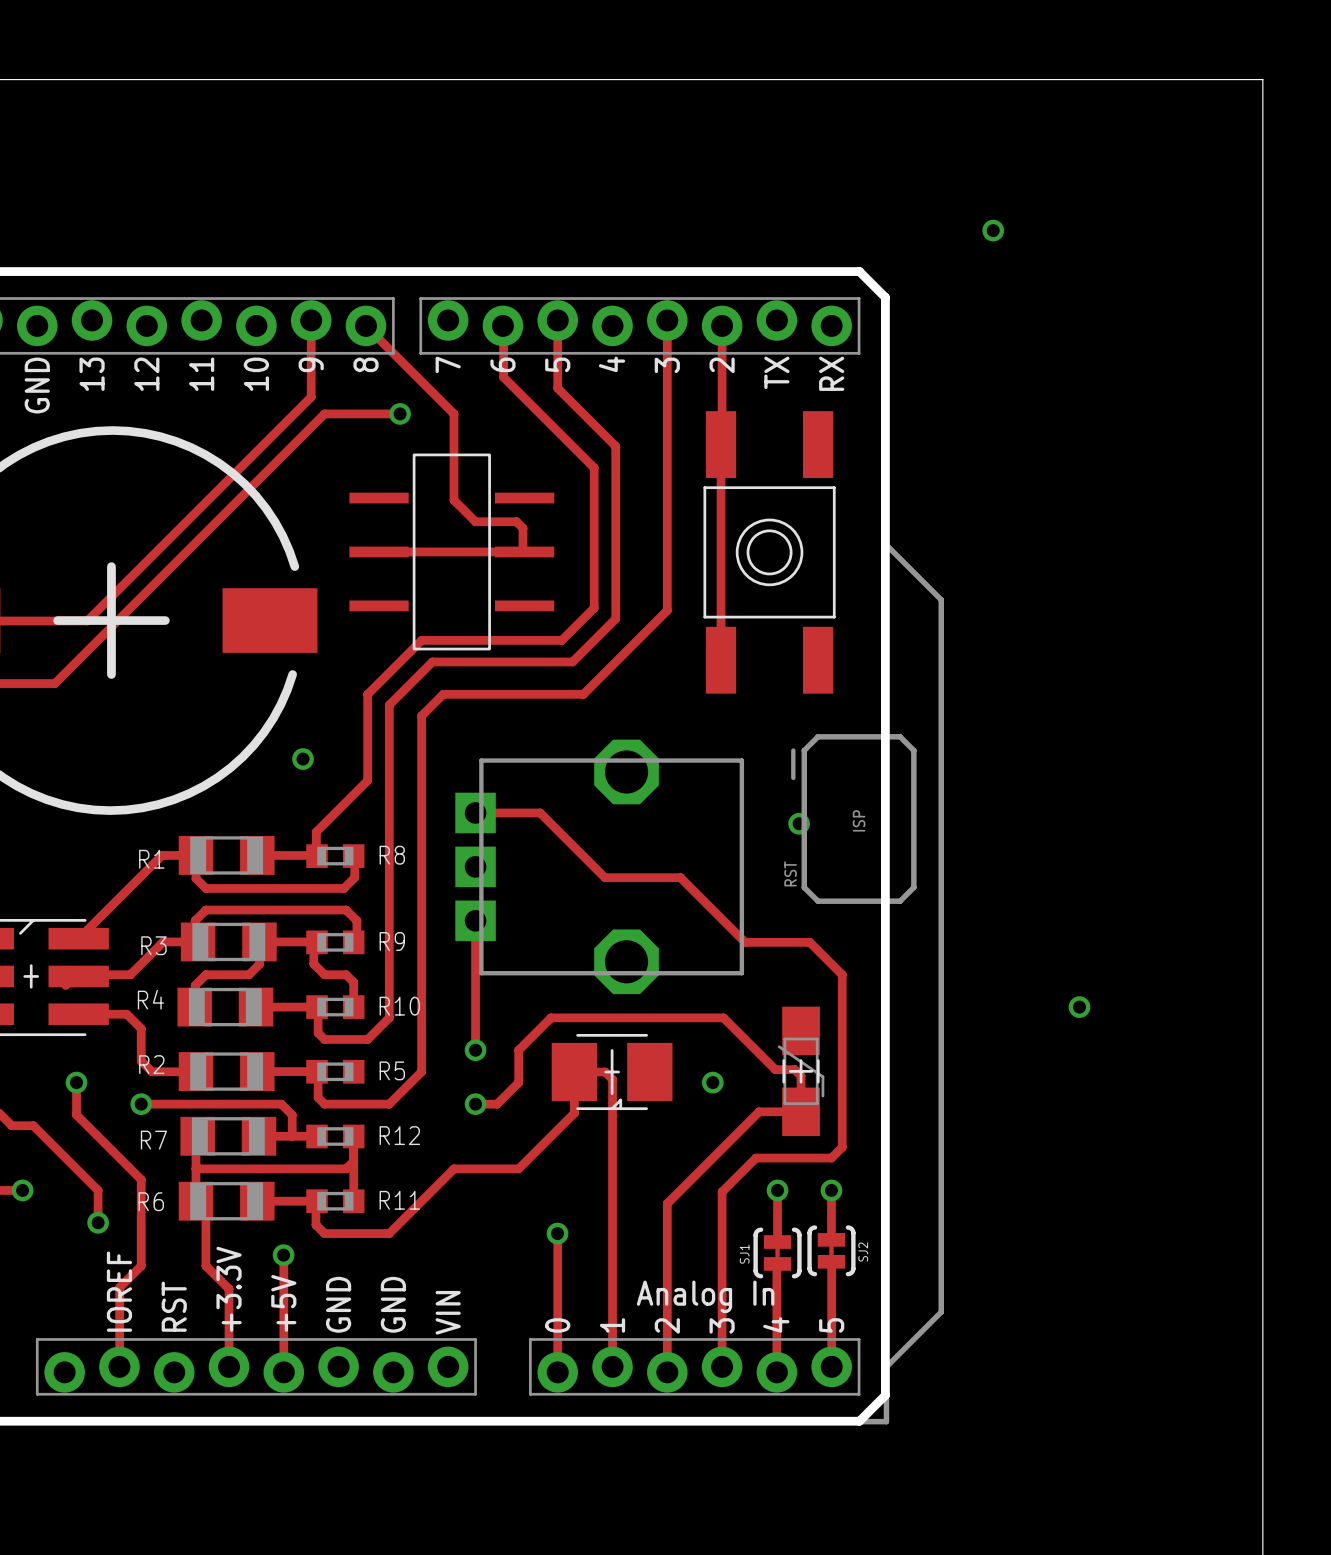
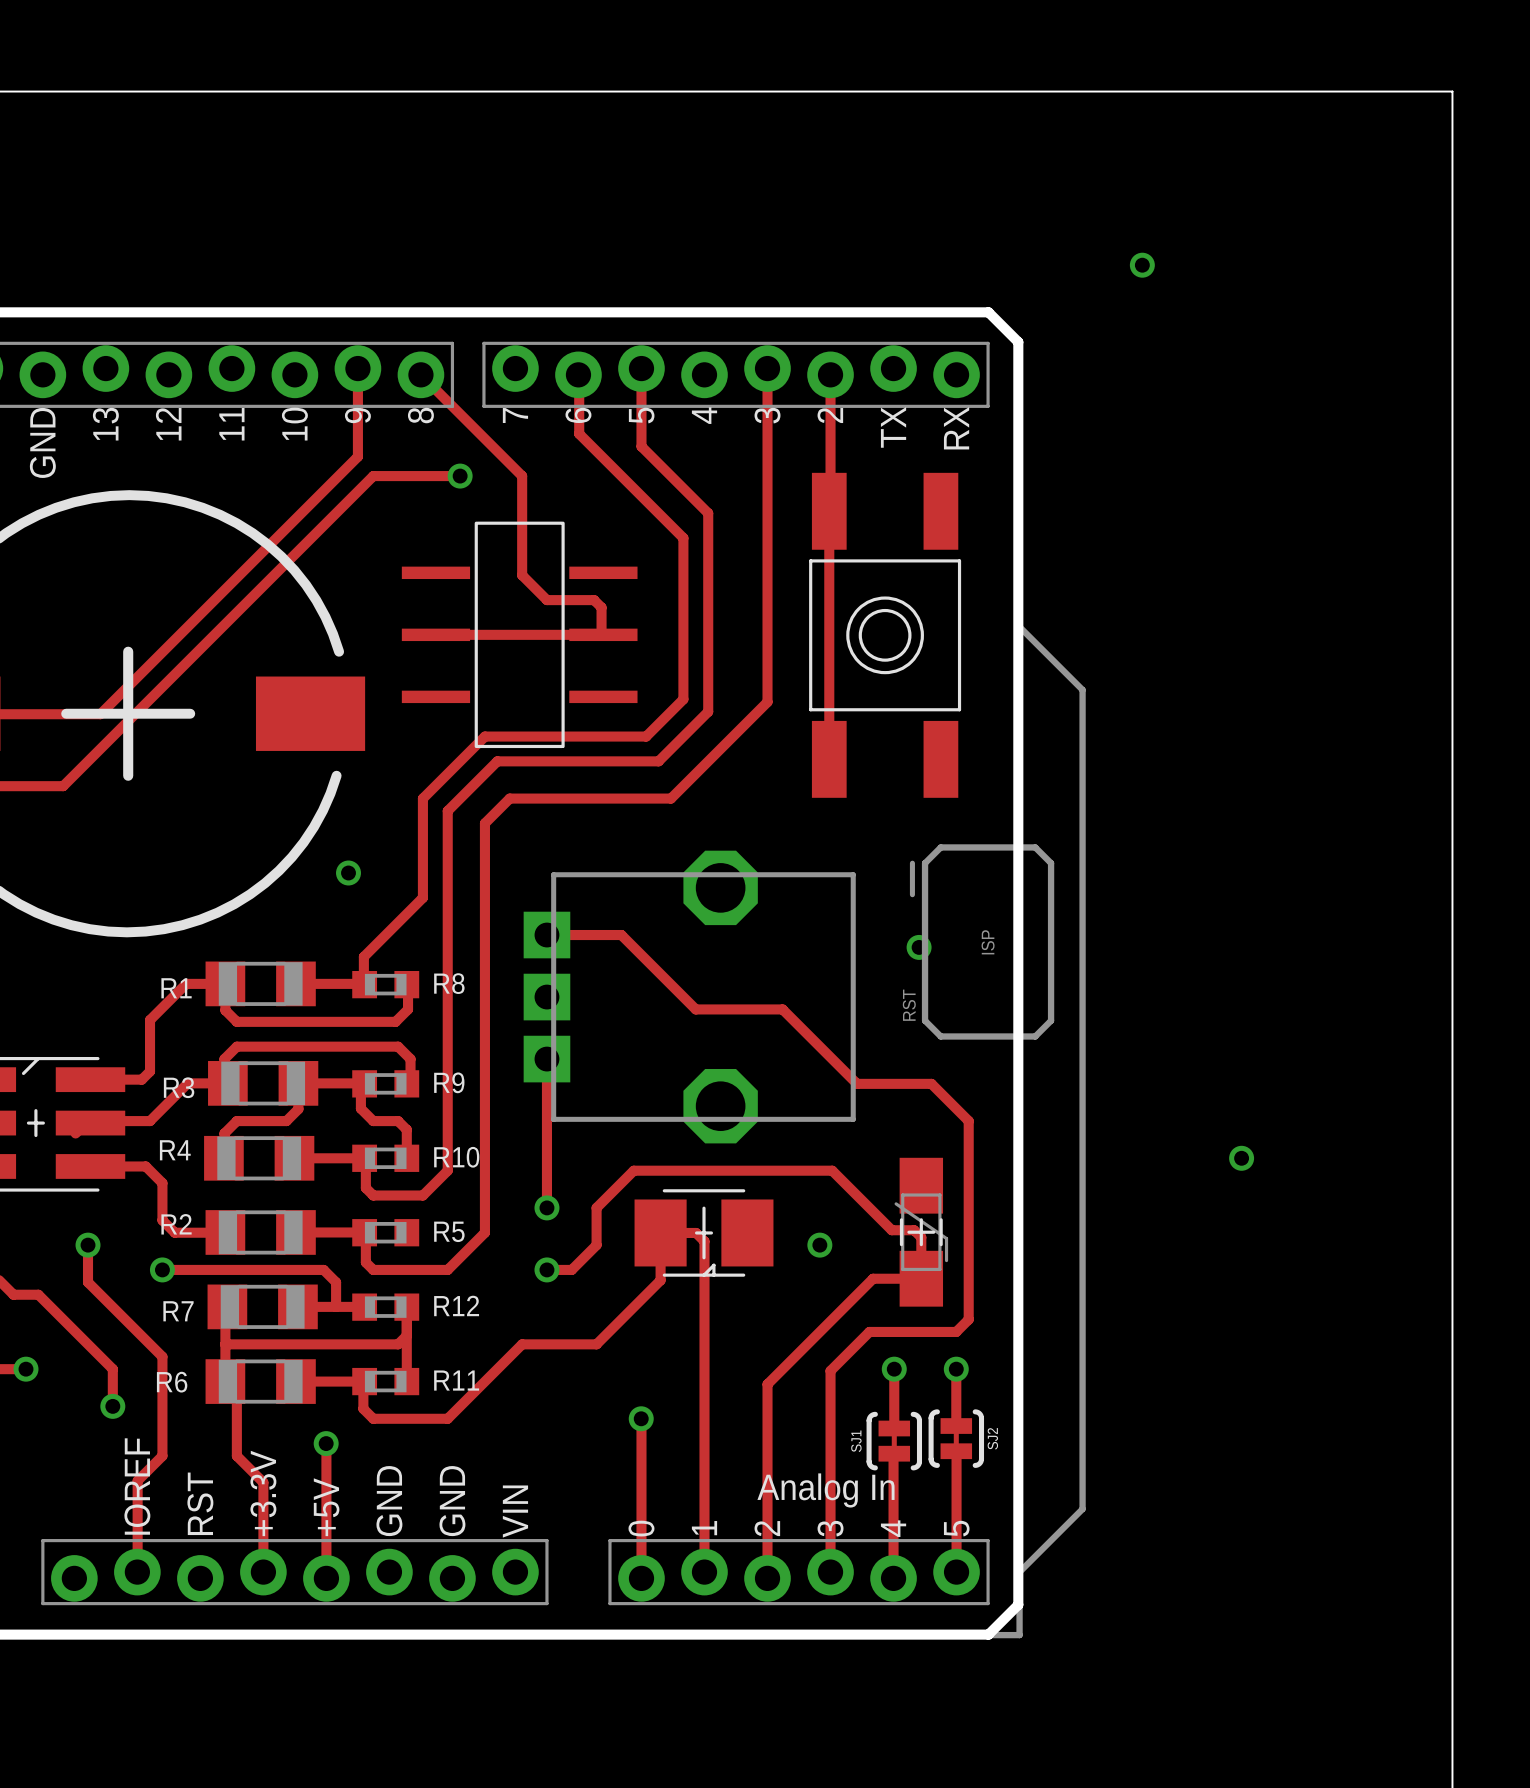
track: (130, 886) (78, 938) -> (150, 1020) (150, 1071) (141, 1079) (90, 1079)

